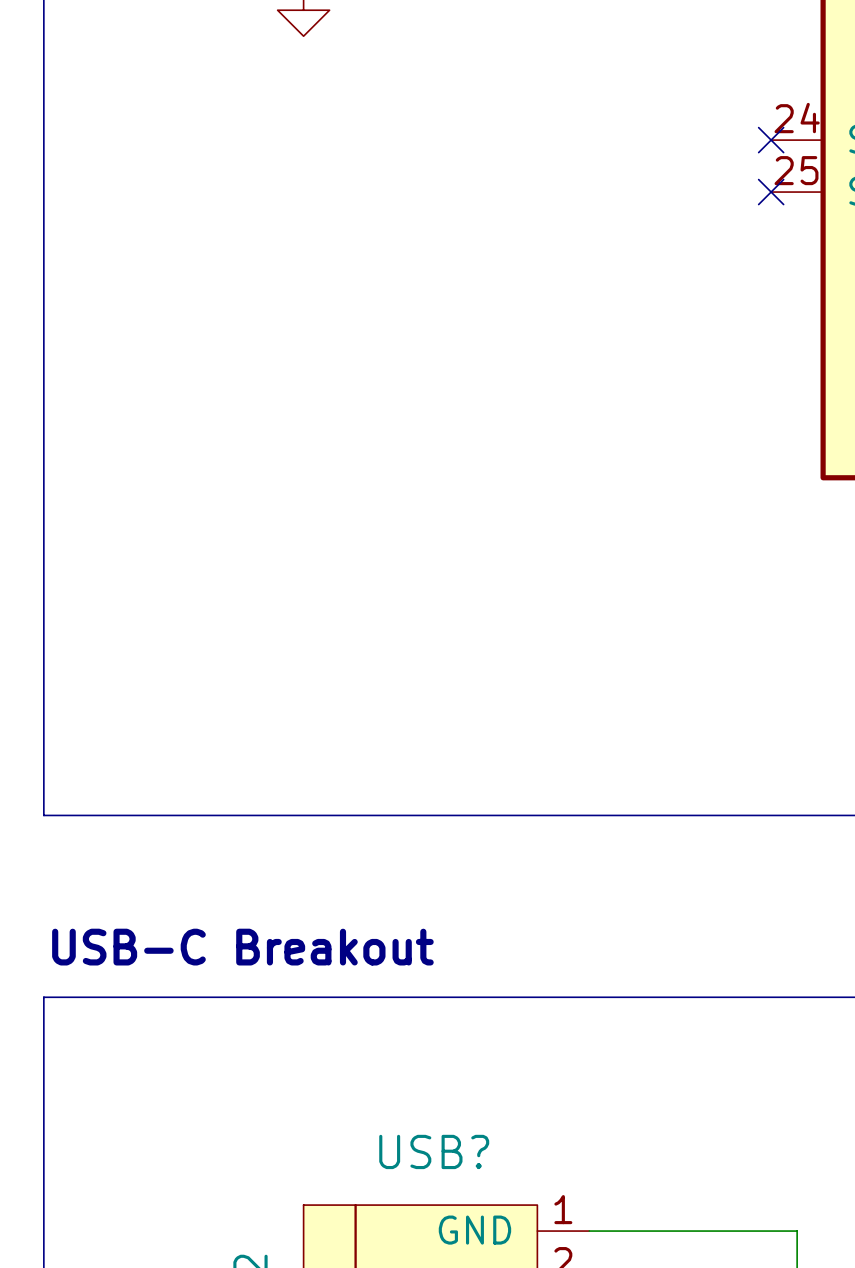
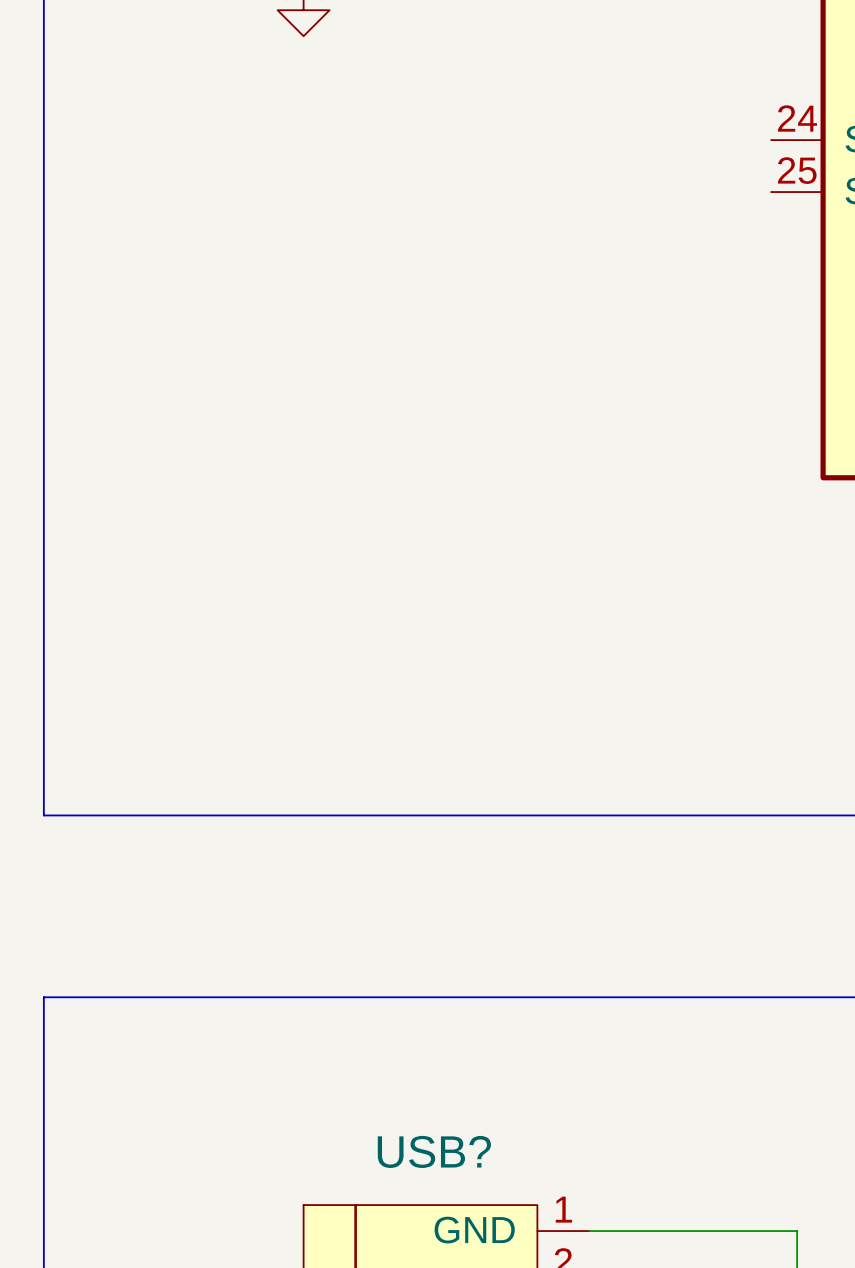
no-connect mark: (771, 140) -> none
no-connect mark: (771, 192) -> none
text: USB-C Breakout (242, 947) -> none

